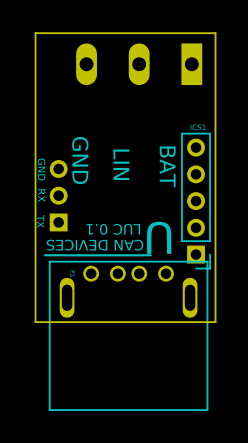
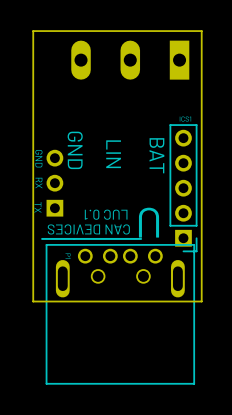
part footprint: [48, 260, 209, 411] -> [45, 244, 195, 385]

